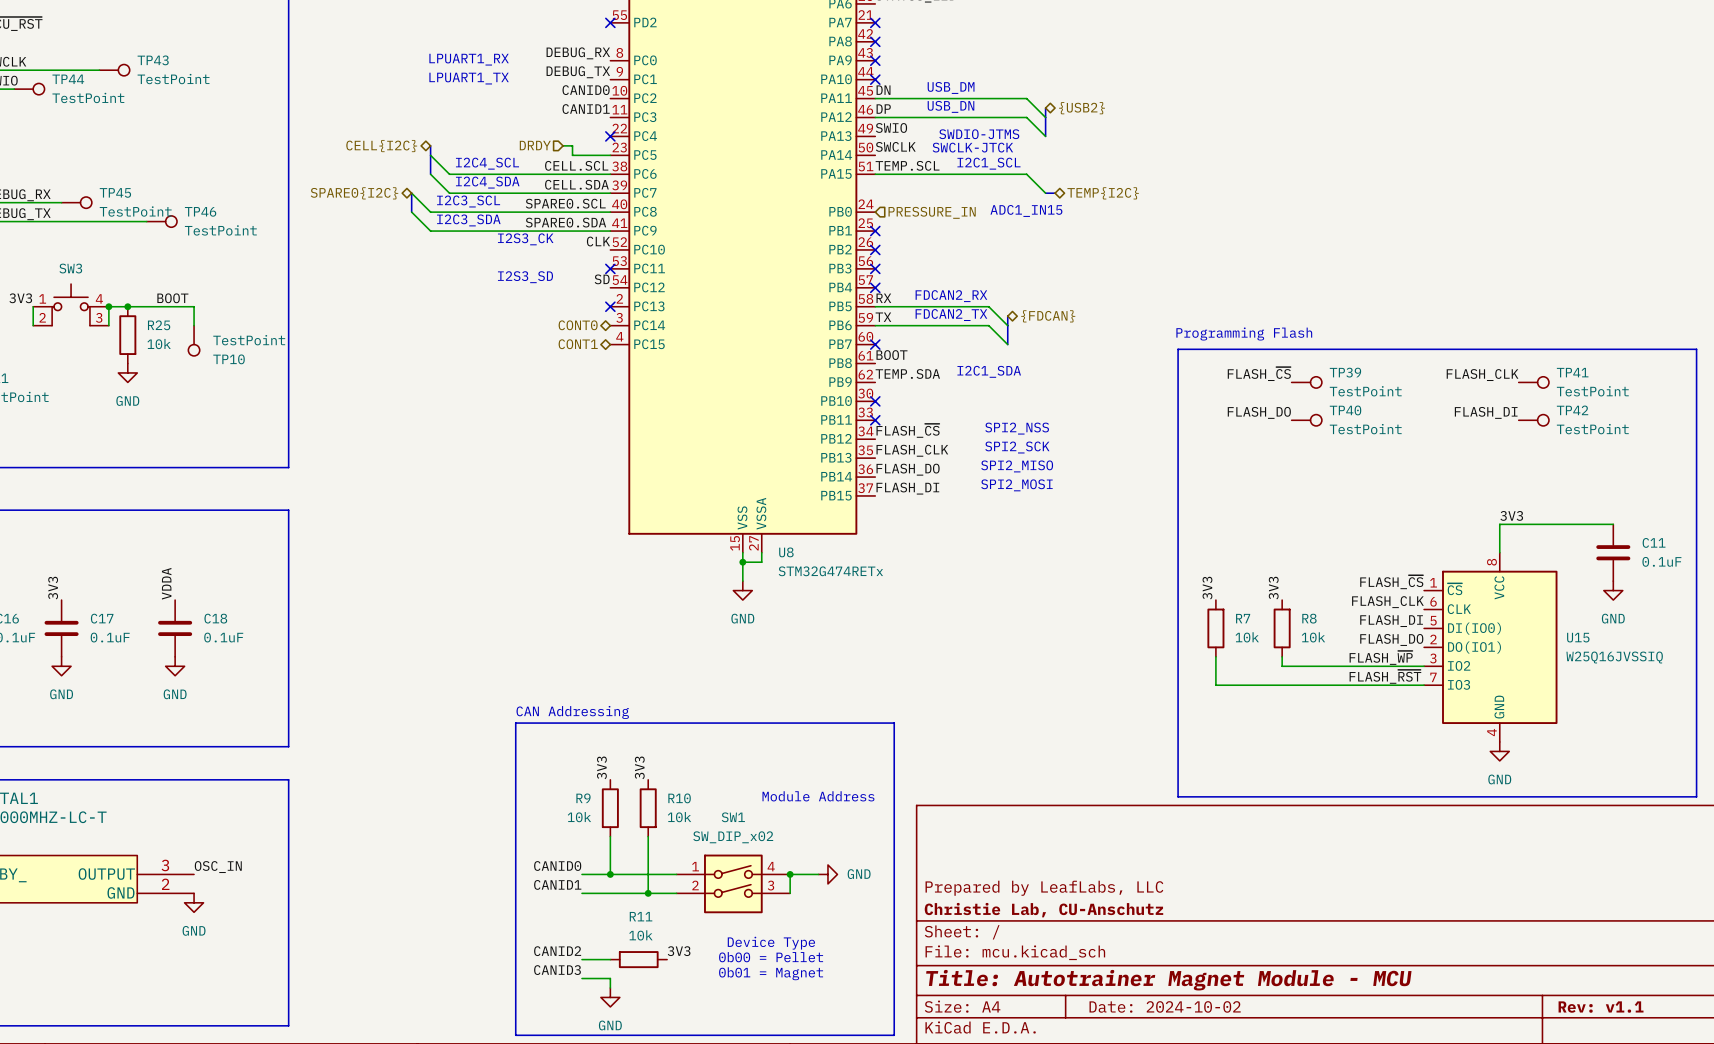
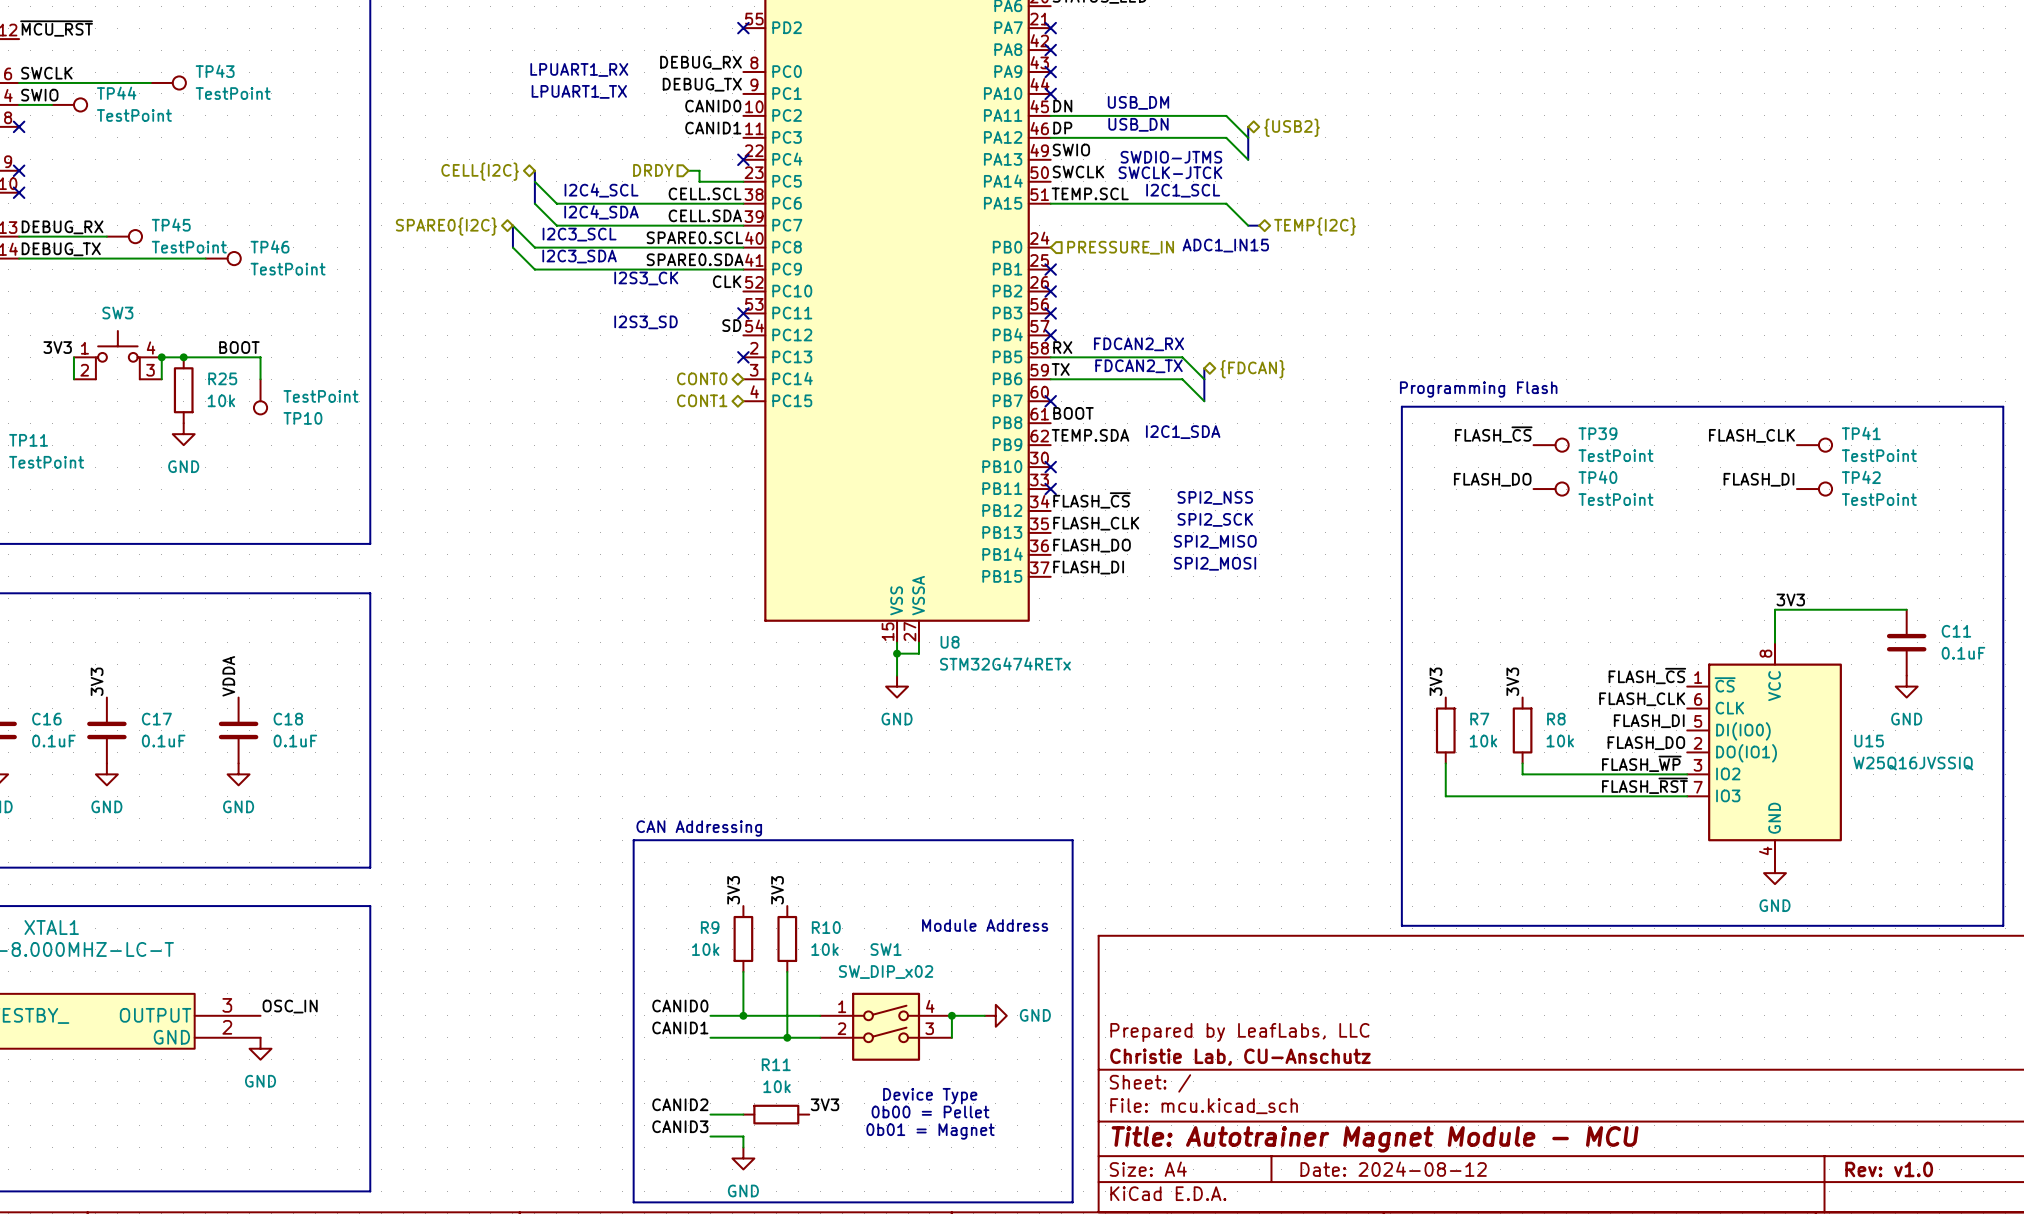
title block: Date: 2024-10-02 (1165, 1006) -> Date: 2024-08-12 (1393, 1169)
title block: Rev: v1.1 (1601, 1007) -> Rev: v1.0 (1889, 1169)

